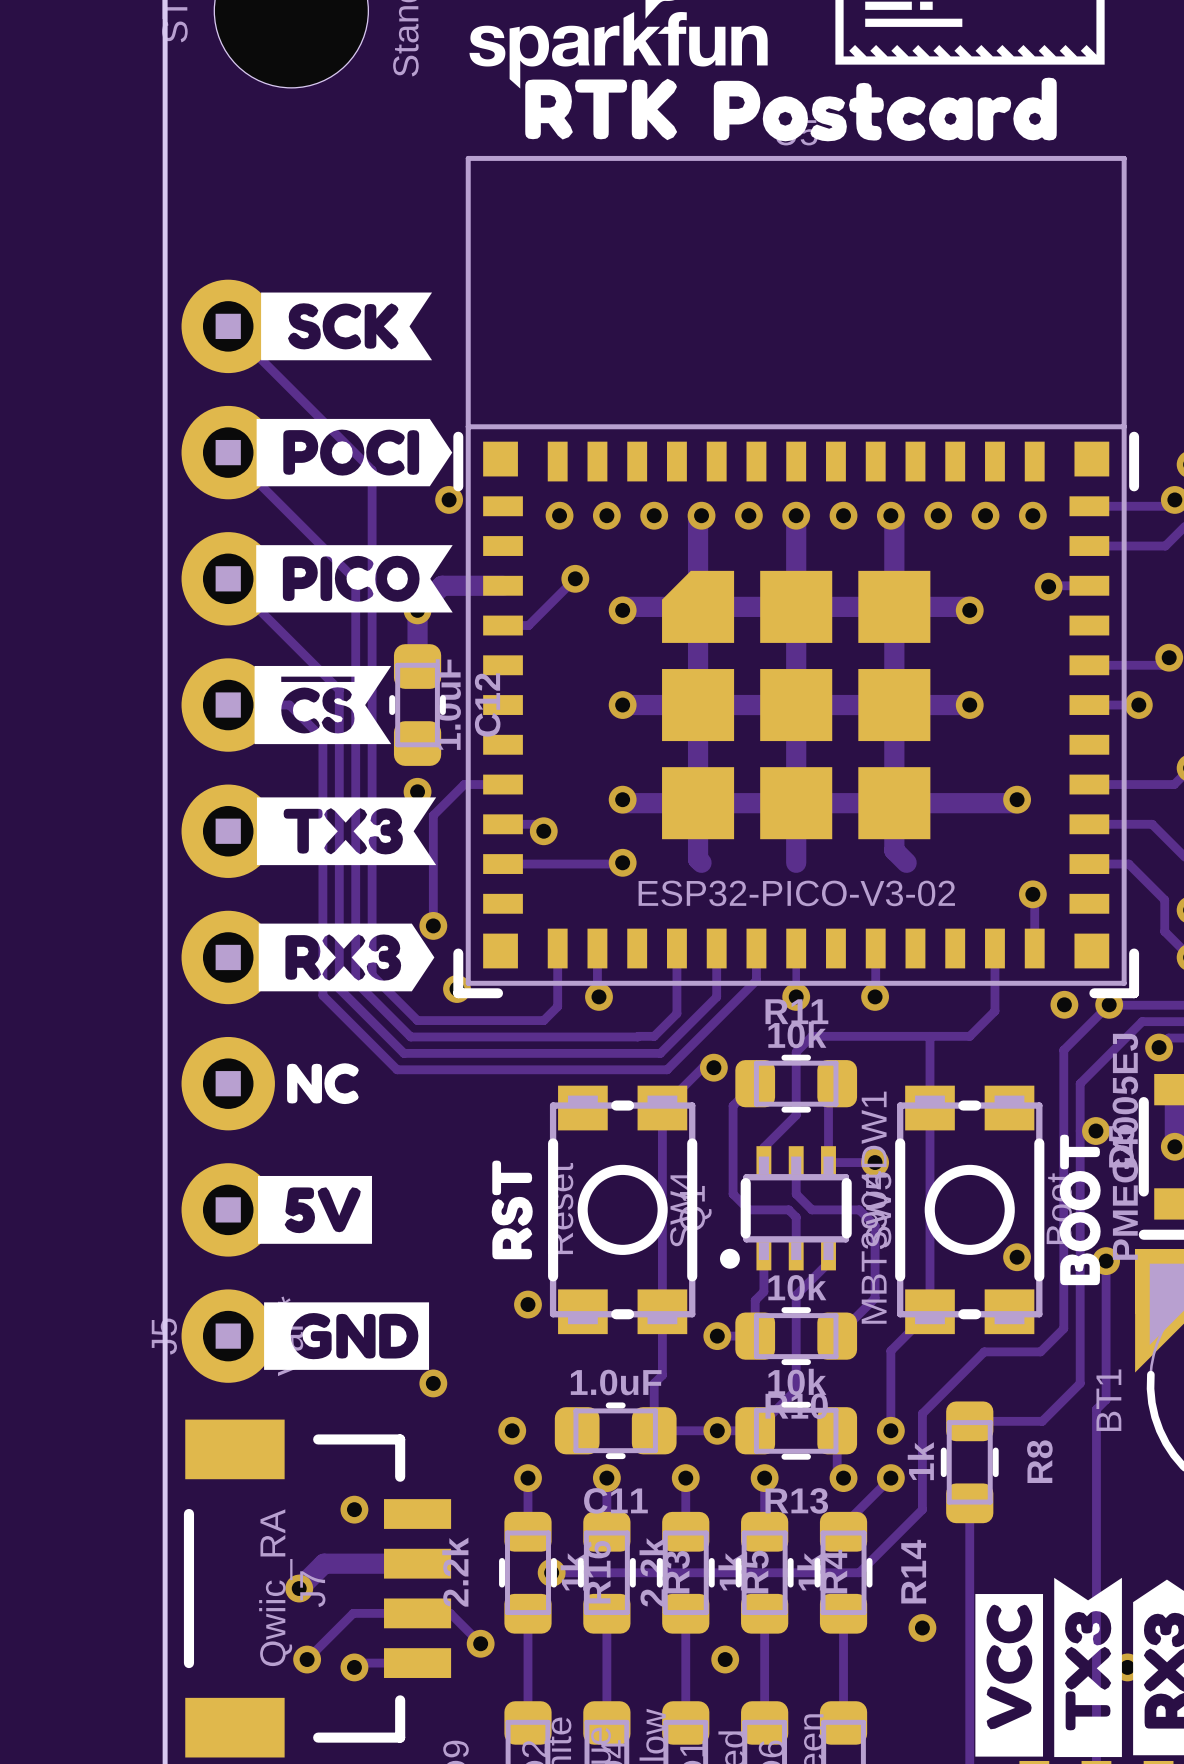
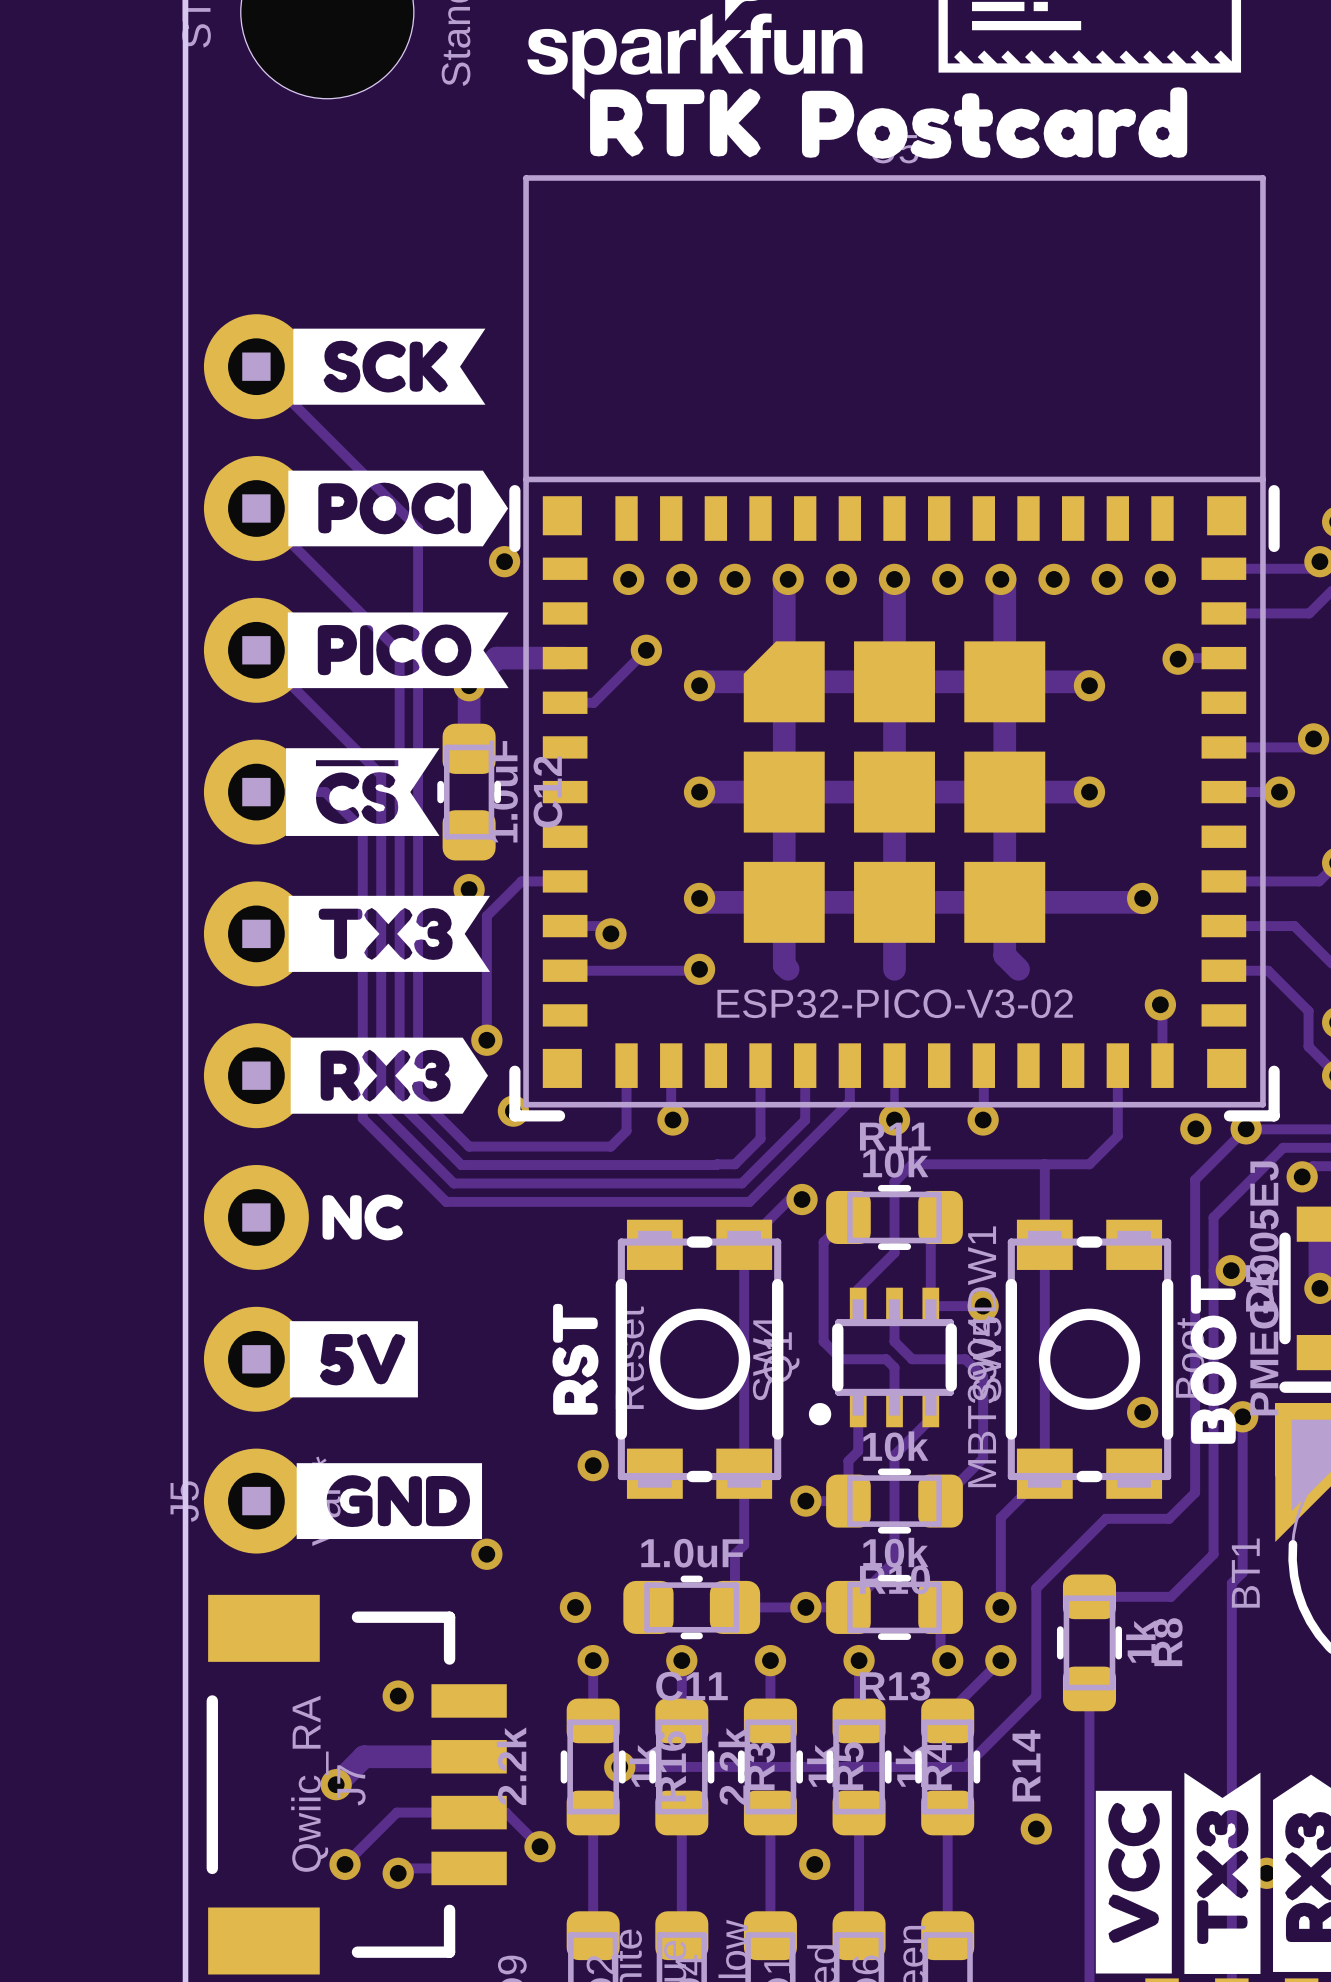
R8 value position: 1k (920, 1461) -> 1k (1140, 1641)

